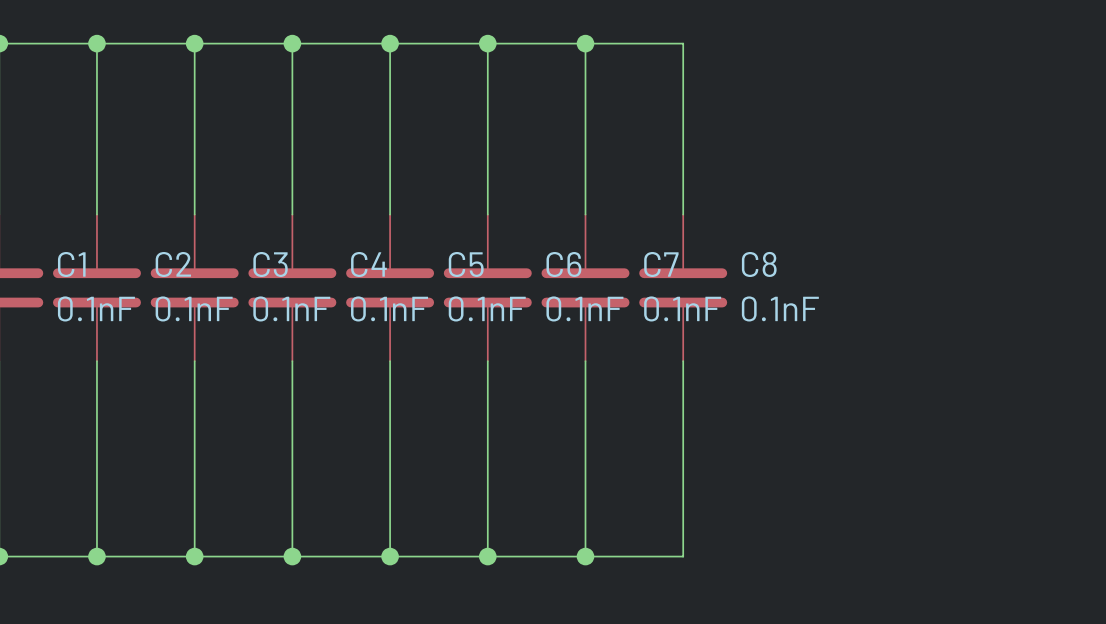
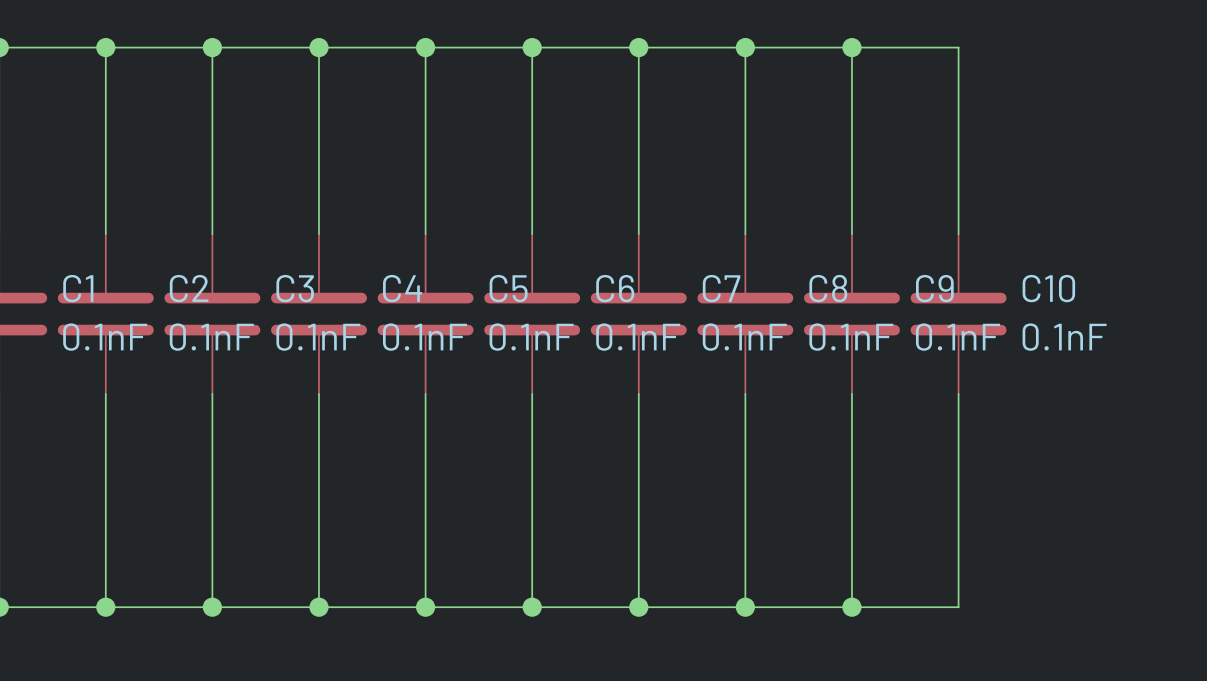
wire: none -> (745, 47) (958, 47) (958, 234)
junction: none -> (745, 47)
wire: none -> (851, 47) (851, 234)
junction: none -> (851, 47)
C9: none -> 0.1nF (851, 314)
C10: none -> 0.1nF (958, 314)
wire: none -> (851, 394) (851, 607)
wire: none -> (958, 394) (958, 607) (745, 607)
junction: none -> (745, 607)
junction: none -> (851, 607)

